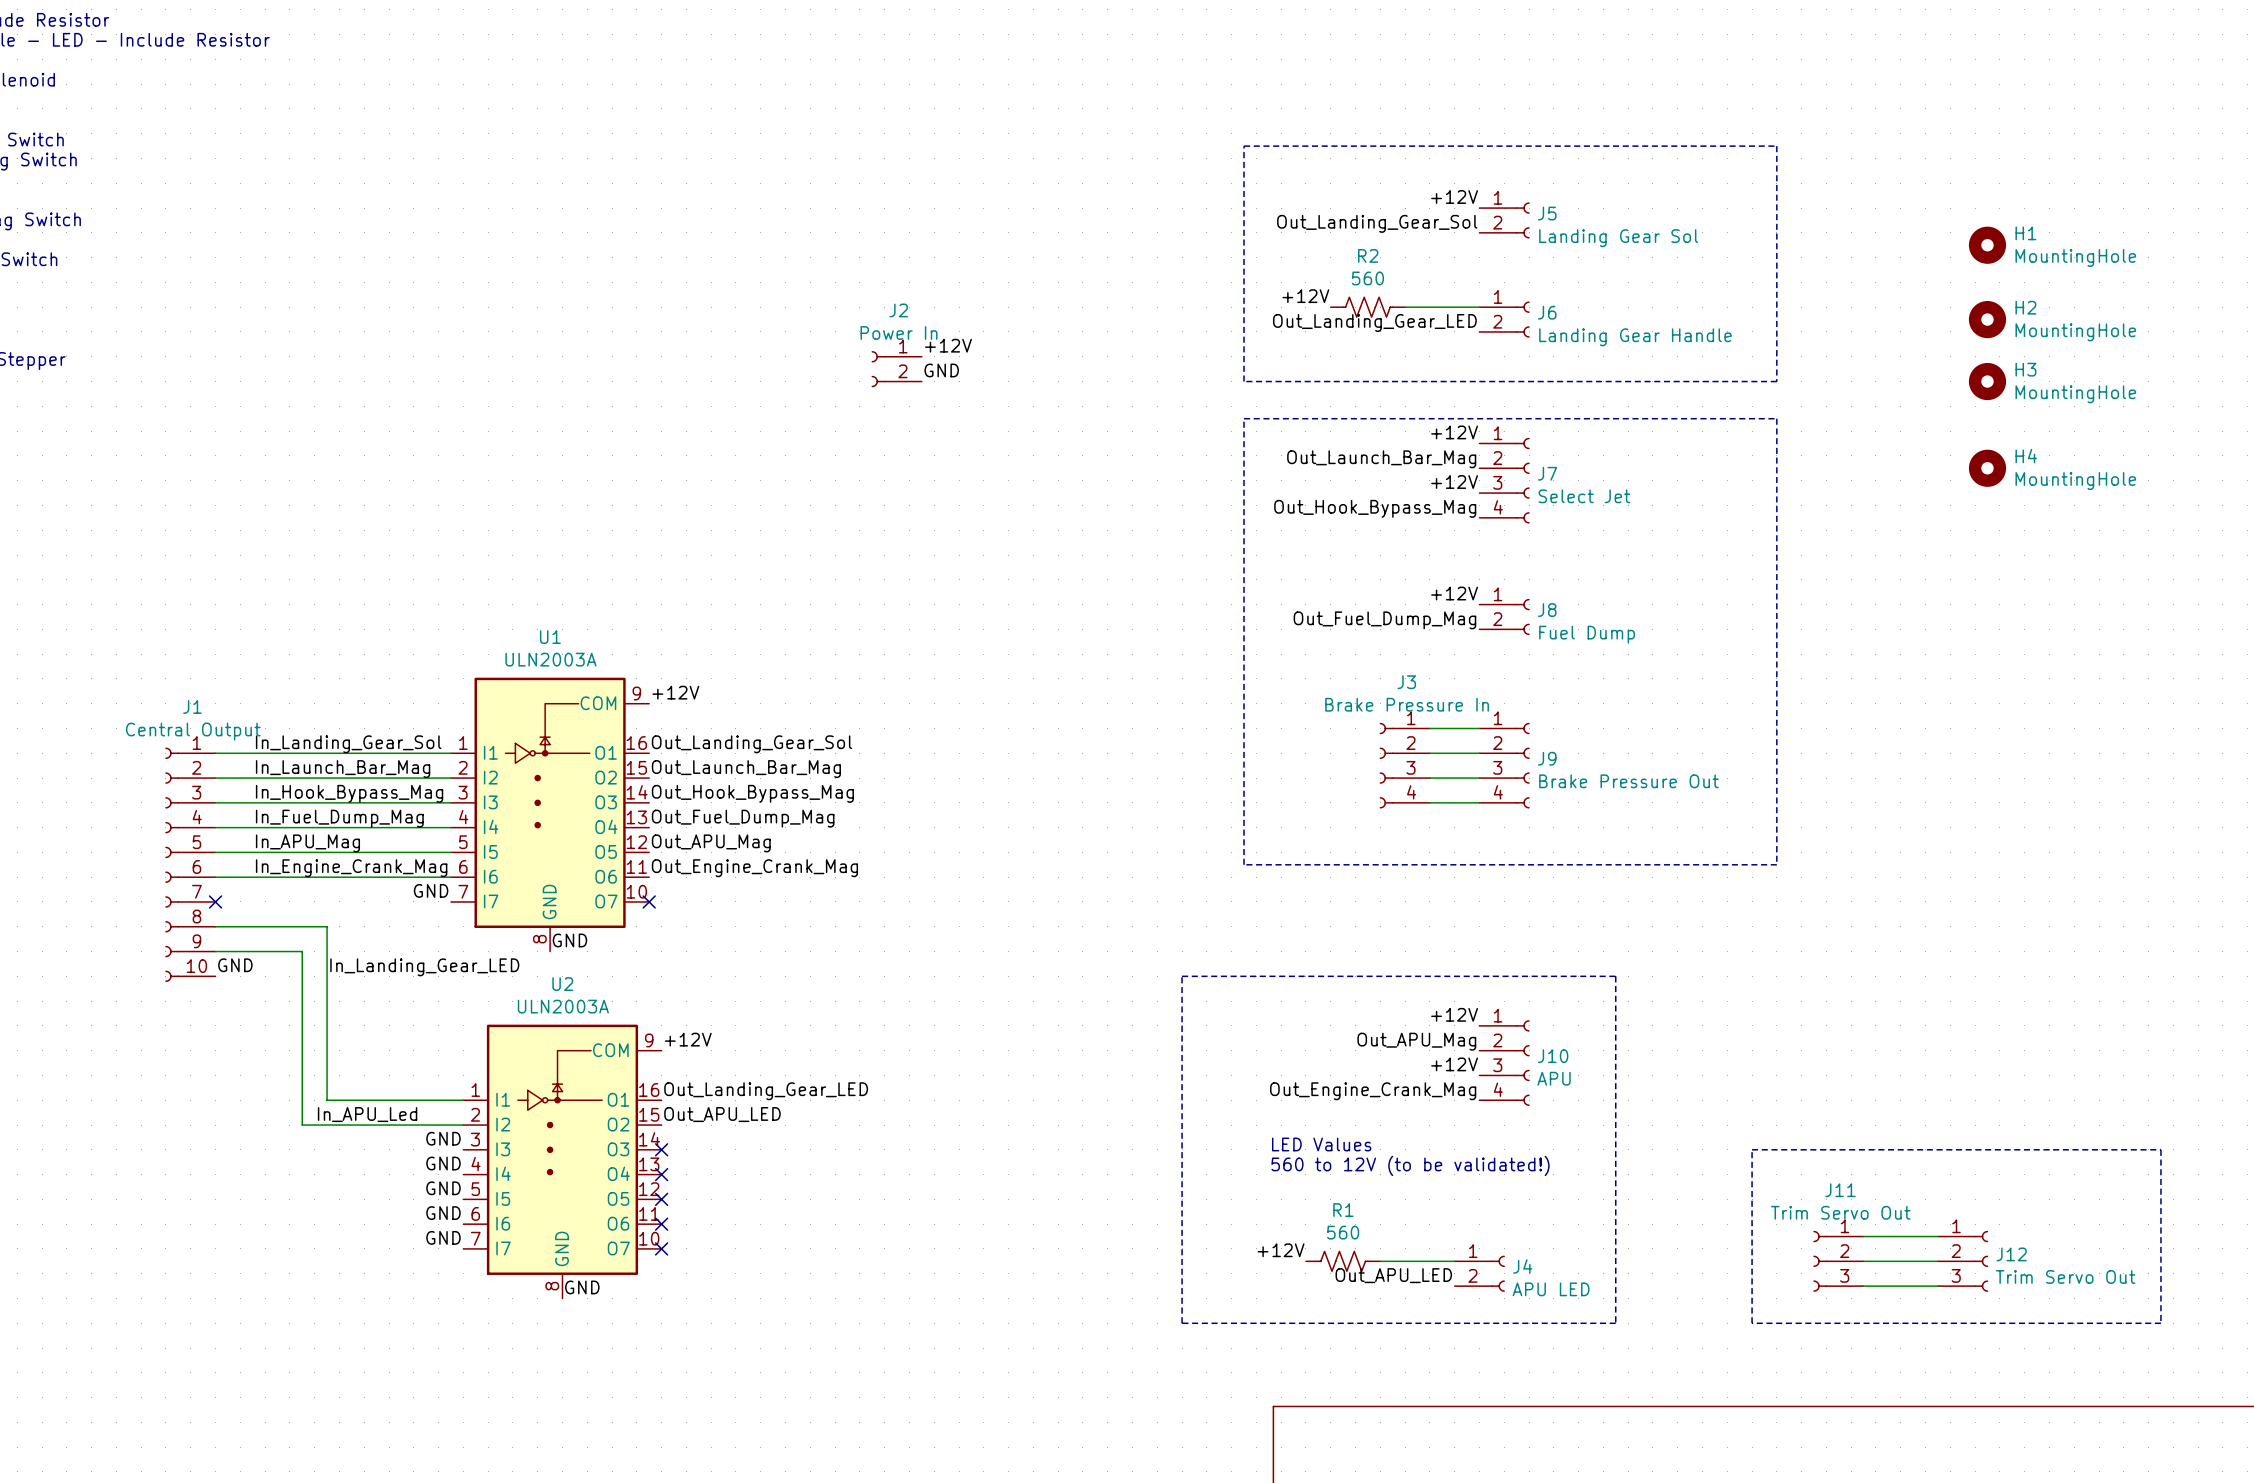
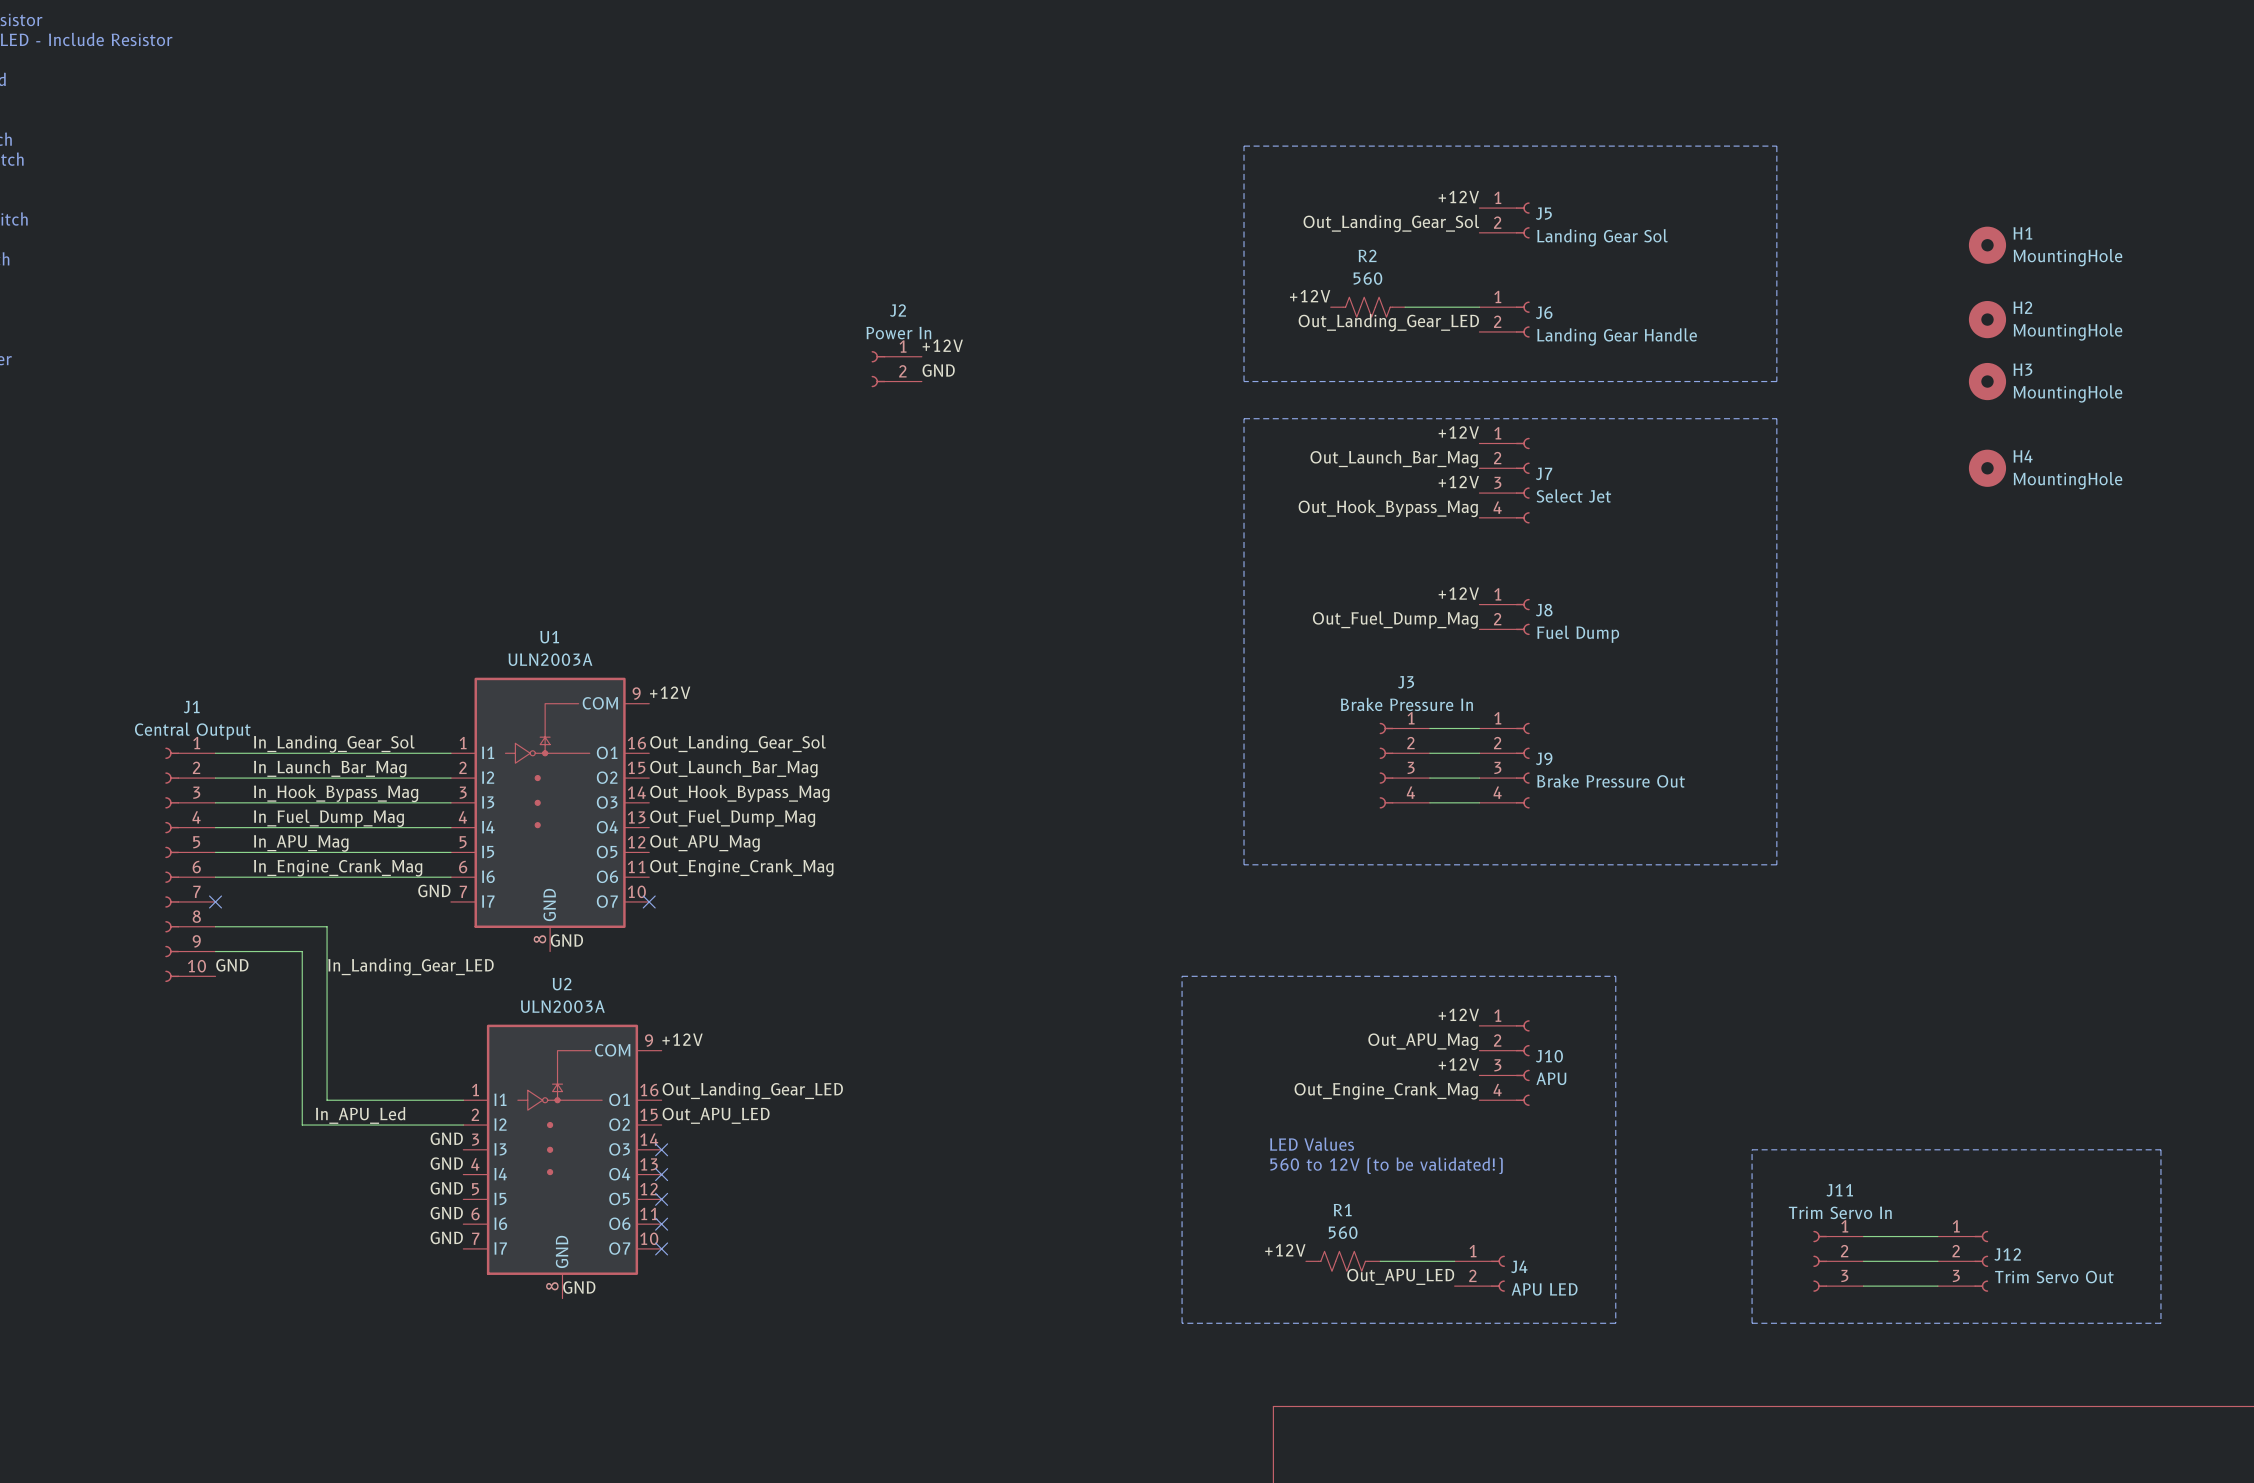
J11 value: Trim Servo Out (1840, 1212) -> Trim Servo In (1840, 1212)

